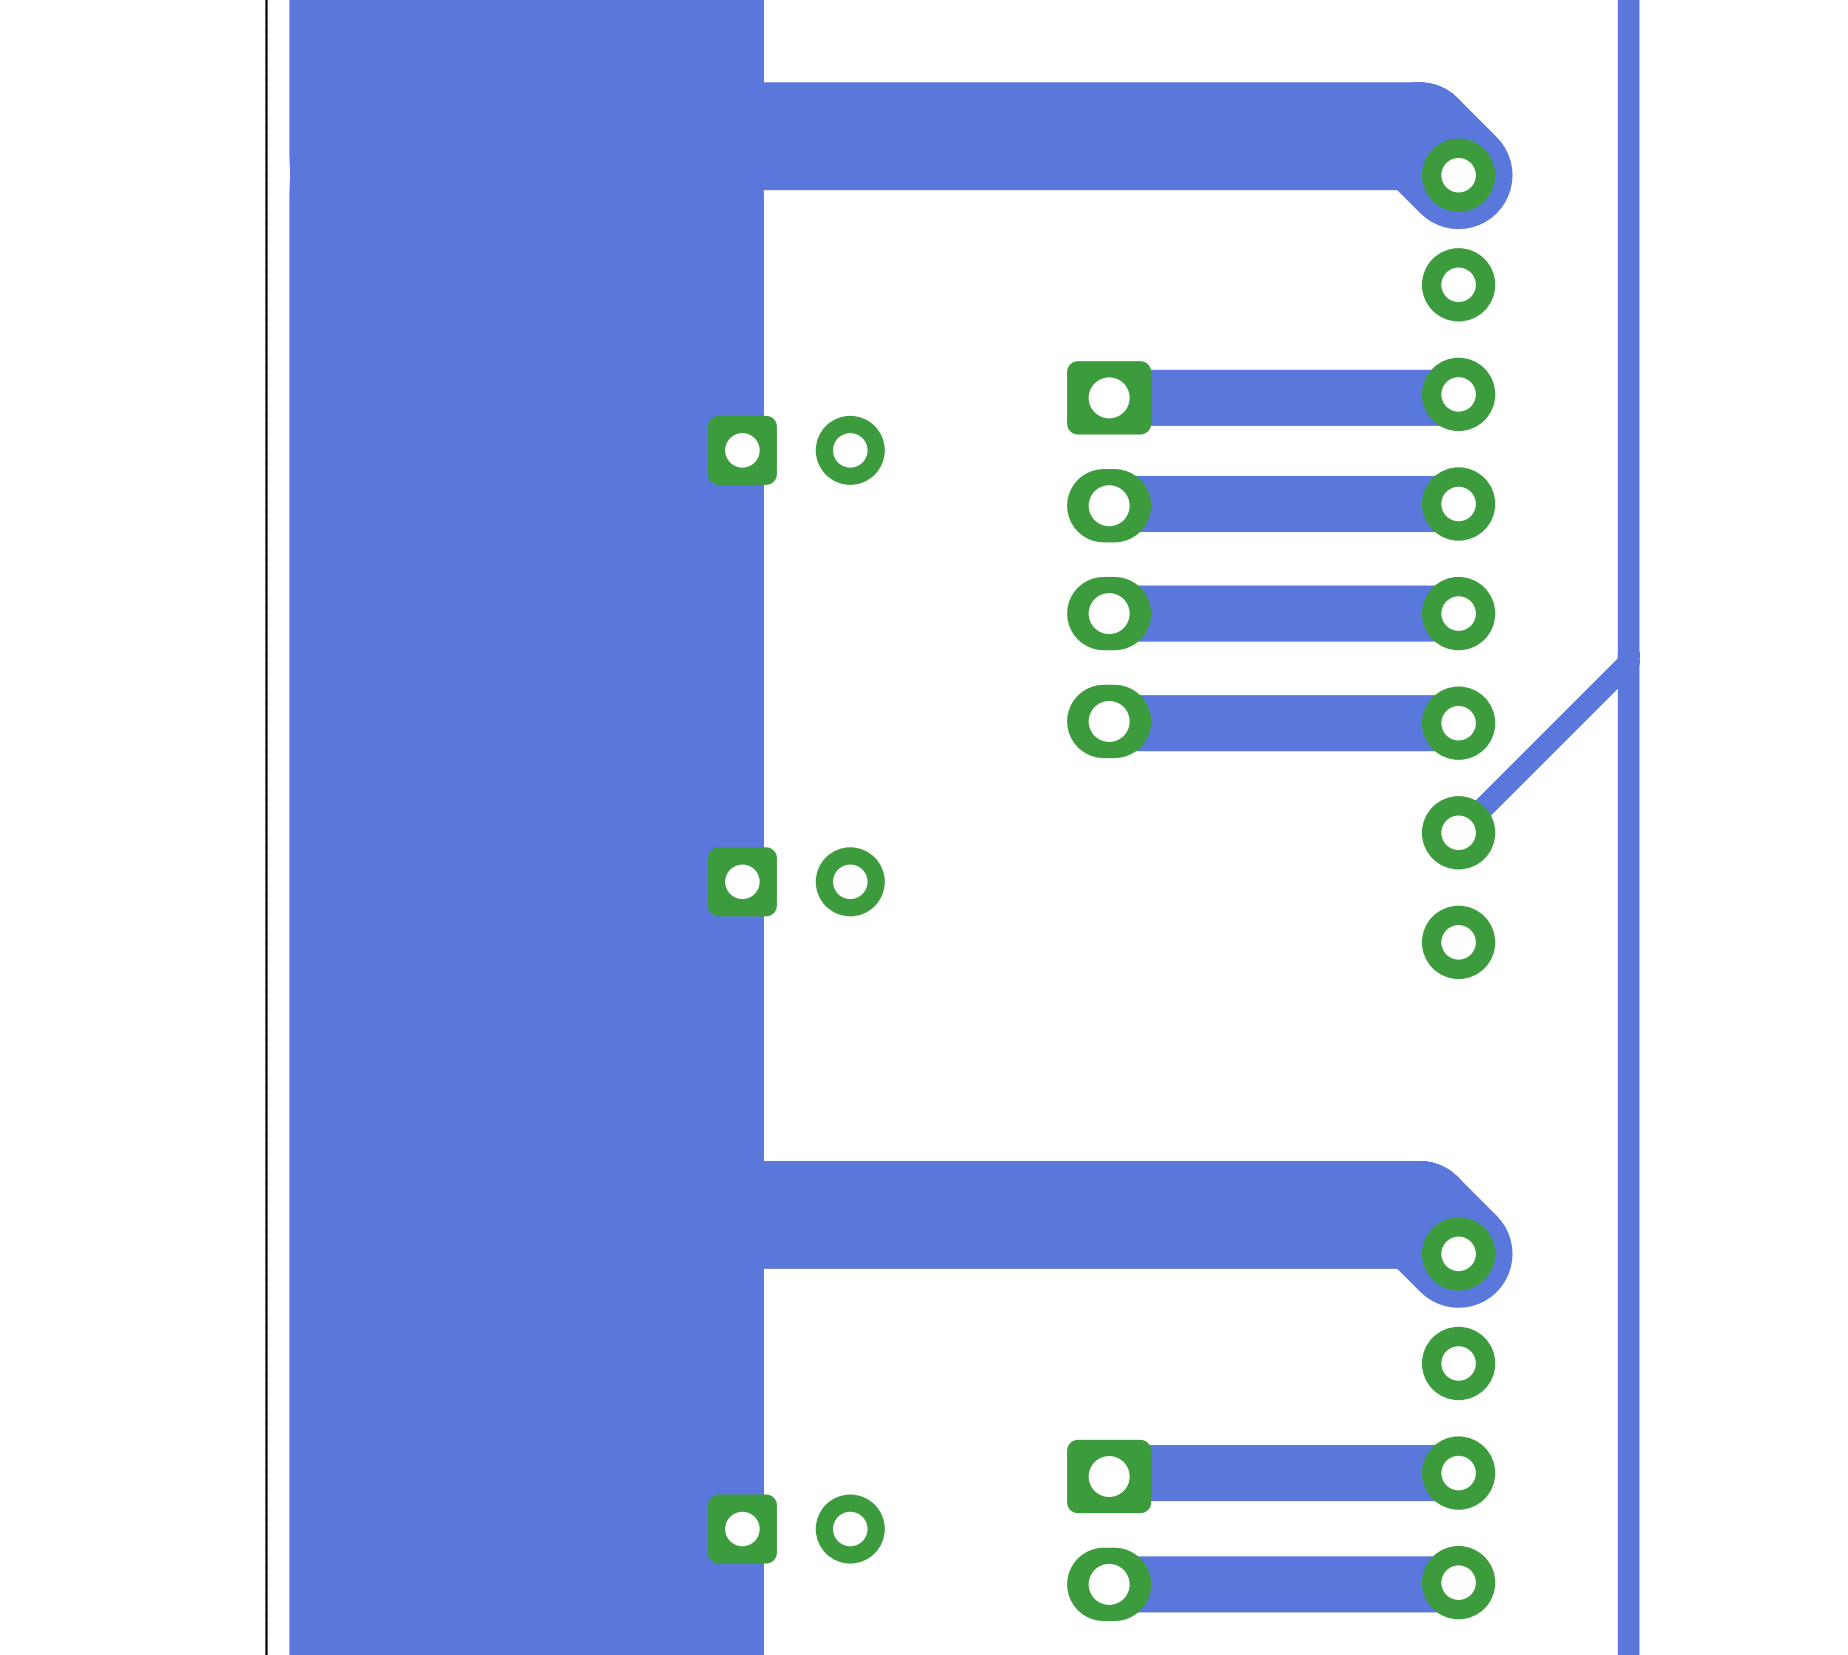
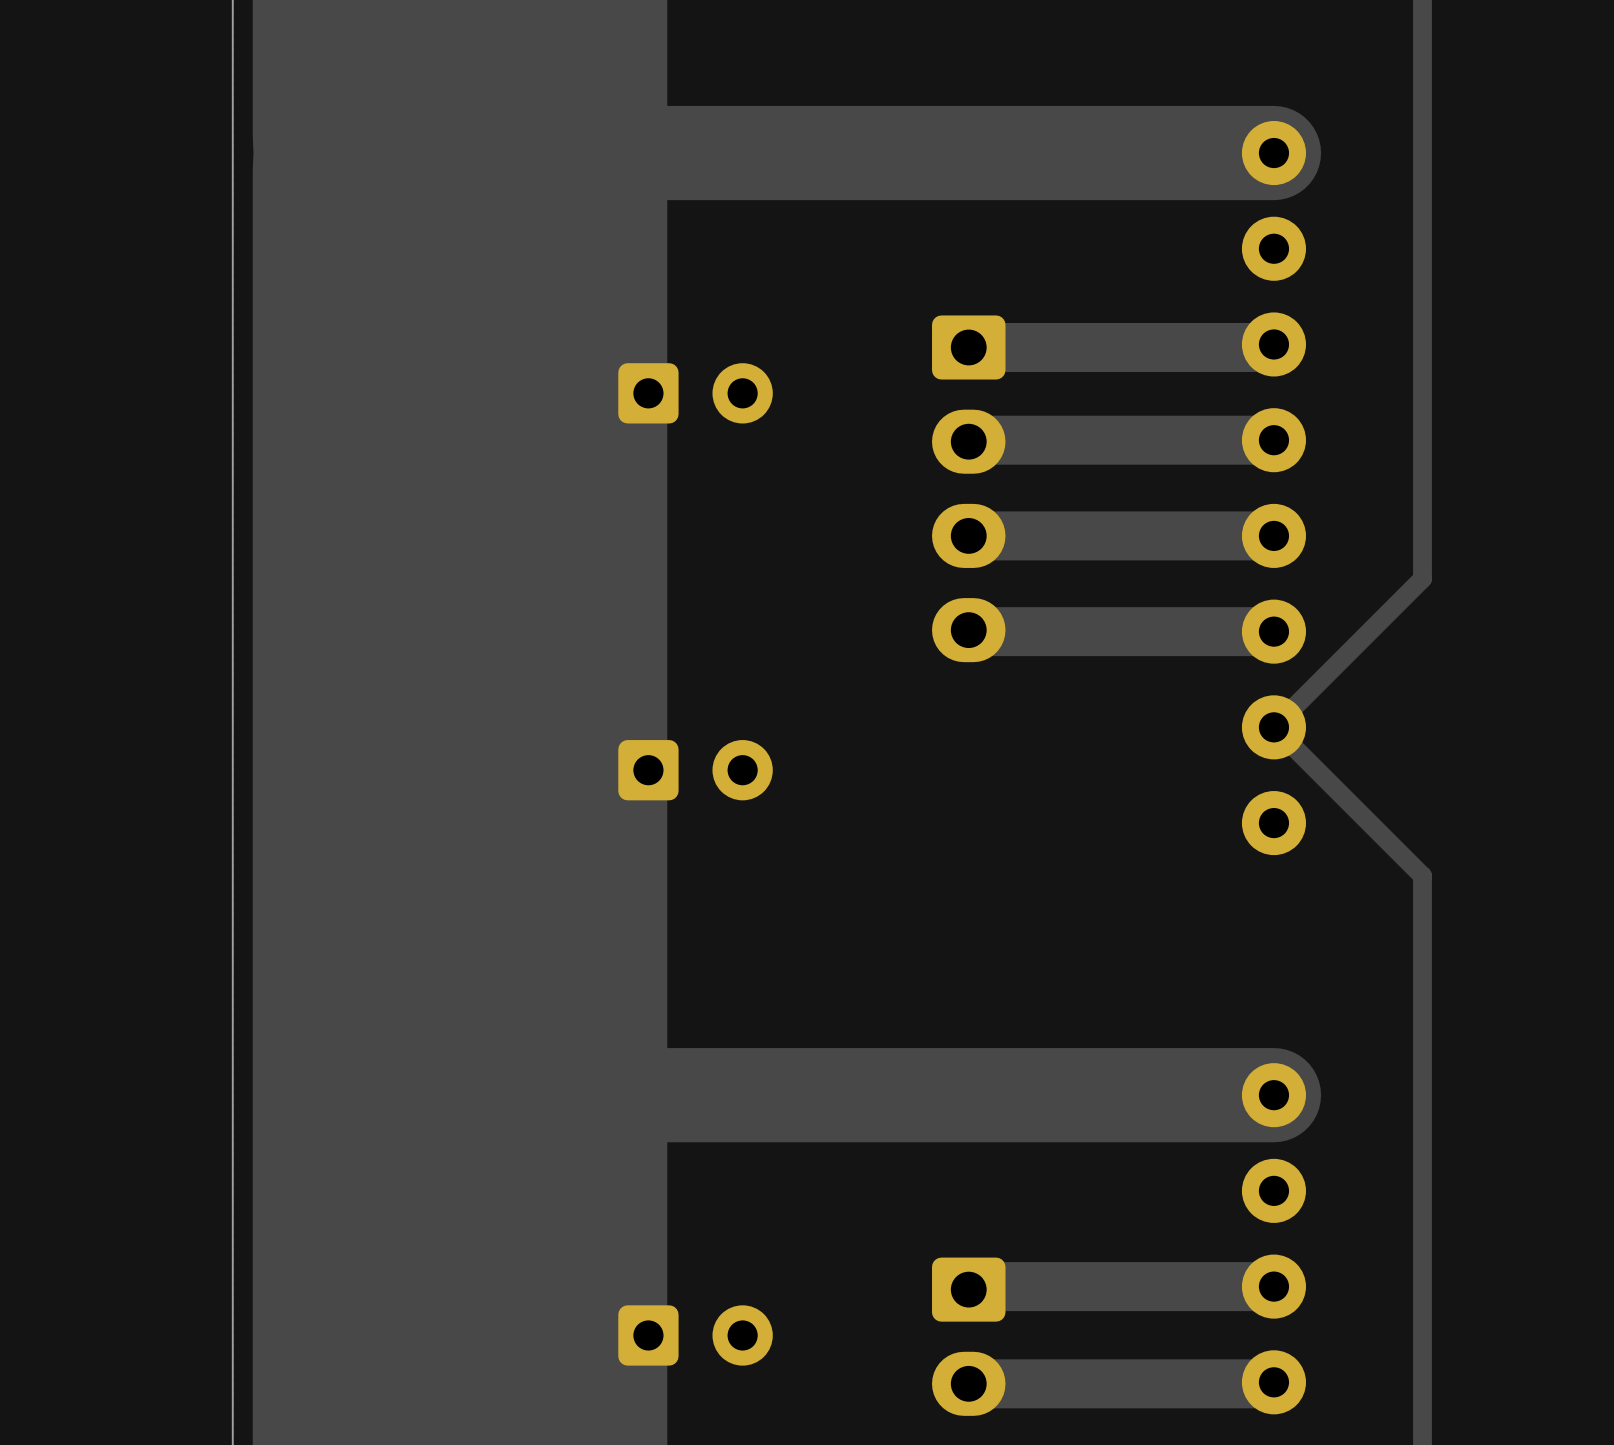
track: (1458, 175) (1419, 136) (587, 136) (548, 175) -> (1273, 153) (478, 153)
track: (1628, 662) (1628, 1002) -> (1273, 727) (1422, 875)
track: (1458, 1253) (1419, 1214) (608, 1214) (569, 1253) -> (1273, 1095) (497, 1095)

